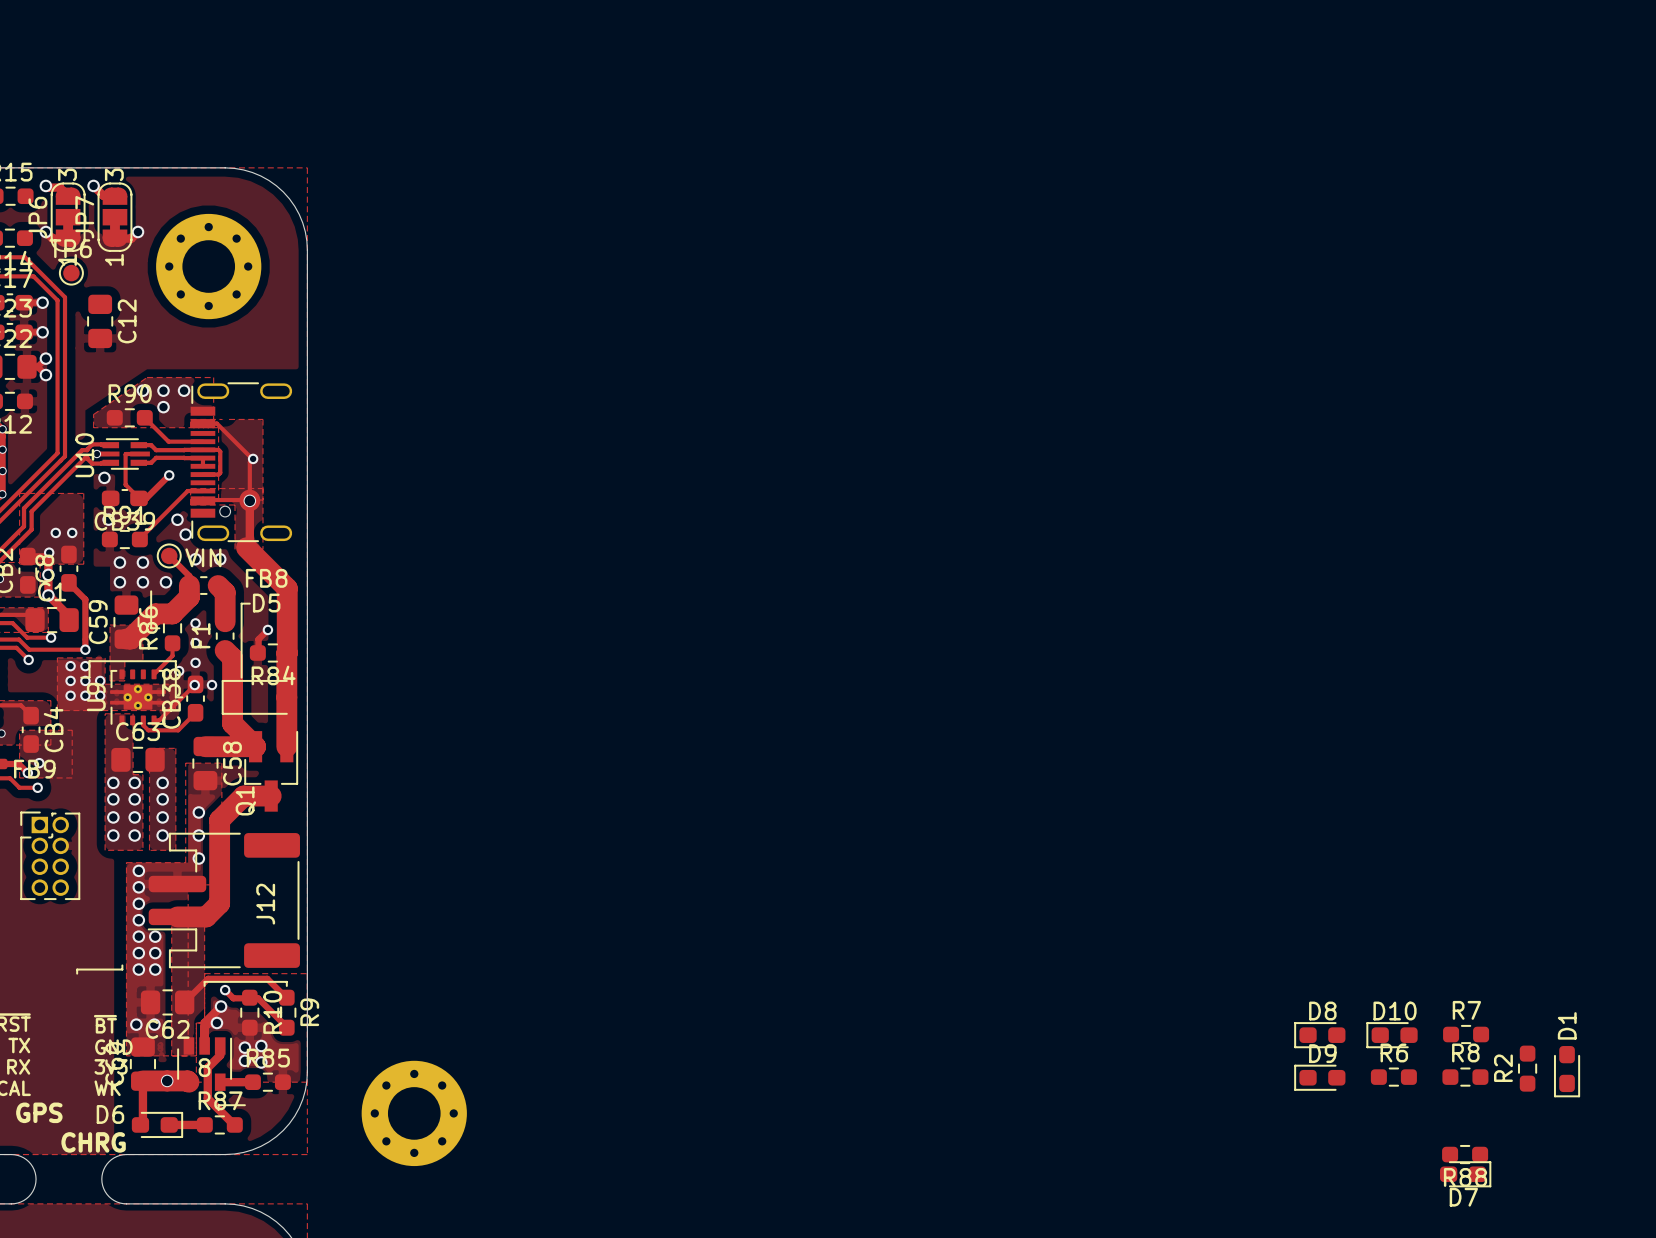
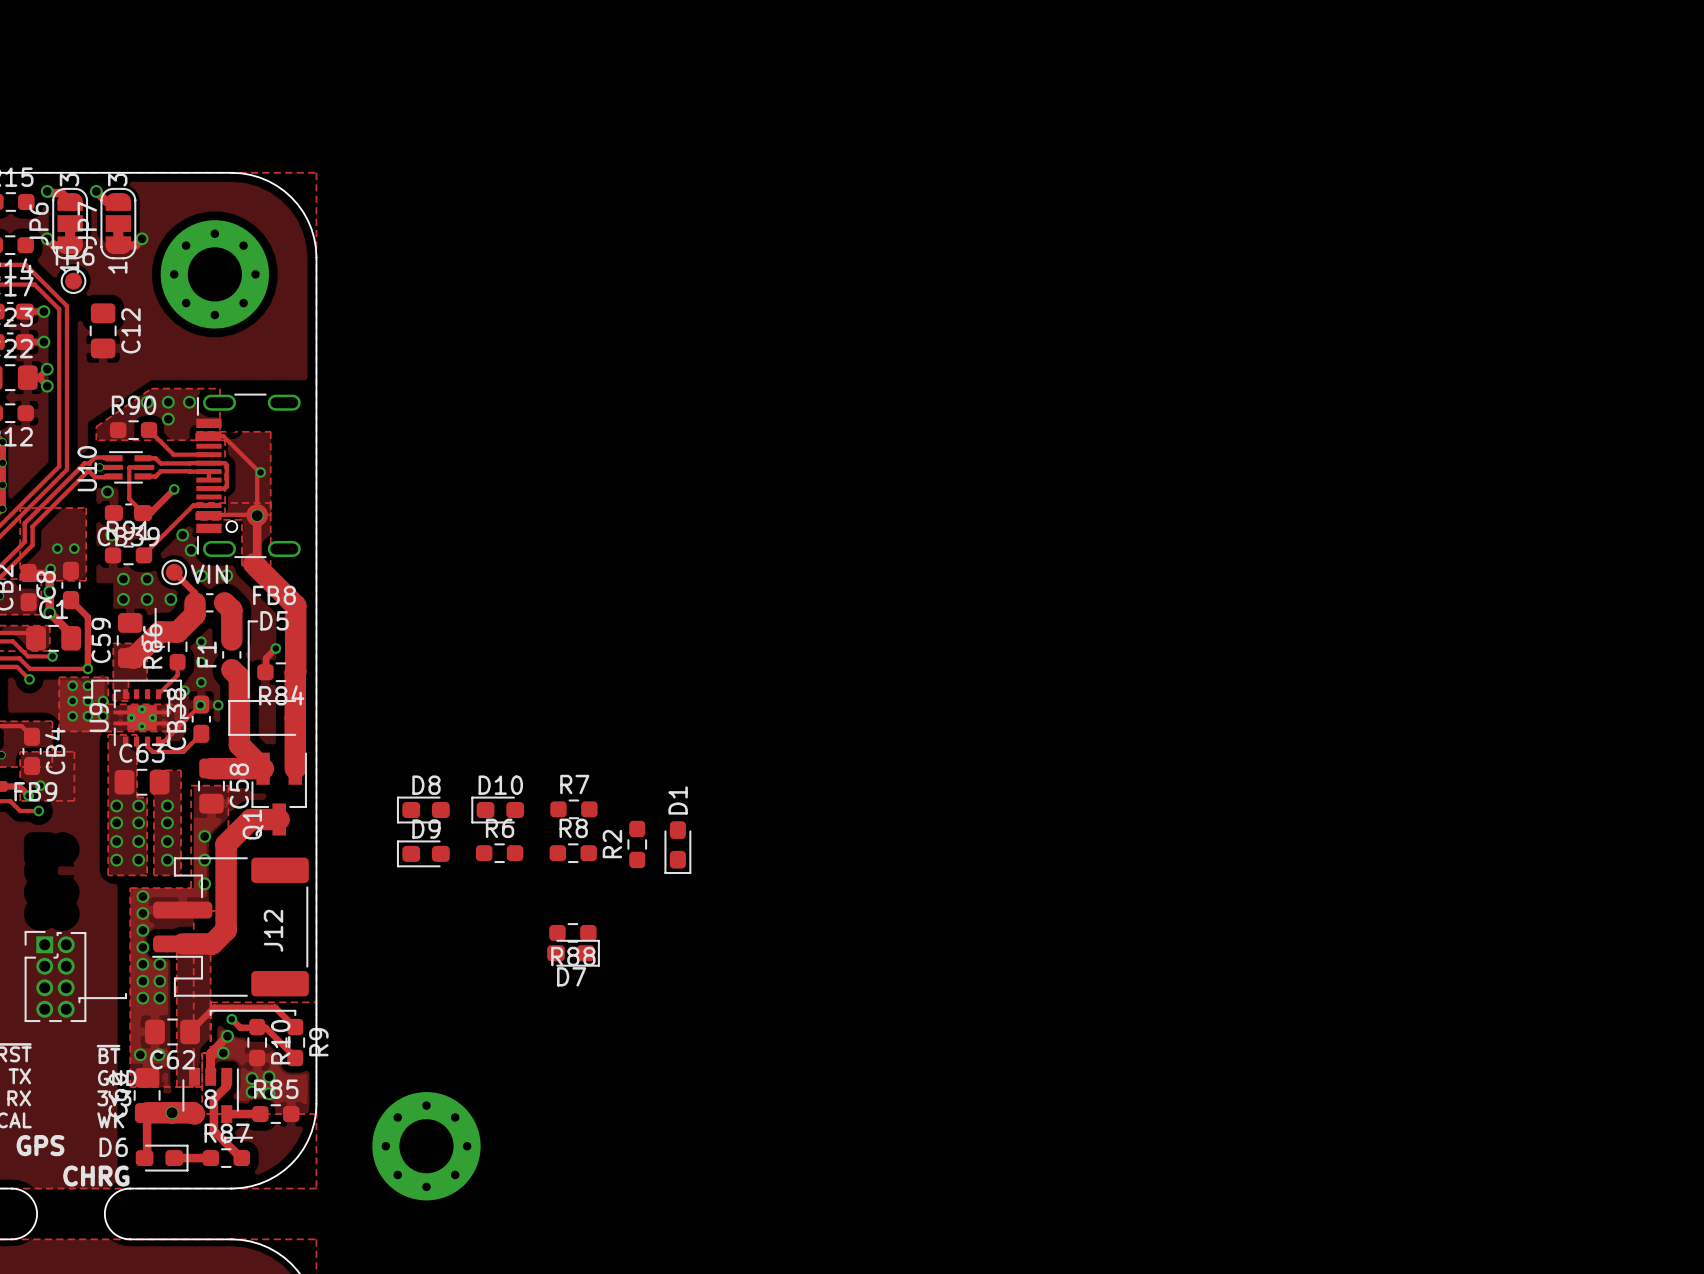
part position: (50, 855) -> (55, 976)
R7 position: (1466, 1034) -> (573, 809)
D8 position: (1319, 1035) -> (423, 810)
D10 position: (1392, 1035) -> (497, 810)
R2 position: (1527, 1068) -> (637, 844)
D1 position: (1567, 1071) -> (677, 847)
D9 position: (1319, 1077) -> (423, 853)
R6 position: (1393, 1077) -> (499, 853)
R8 position: (1465, 1077) -> (573, 853)
R88 position: (1465, 1154) -> (572, 932)
D7 position: (1465, 1174) -> (573, 953)

